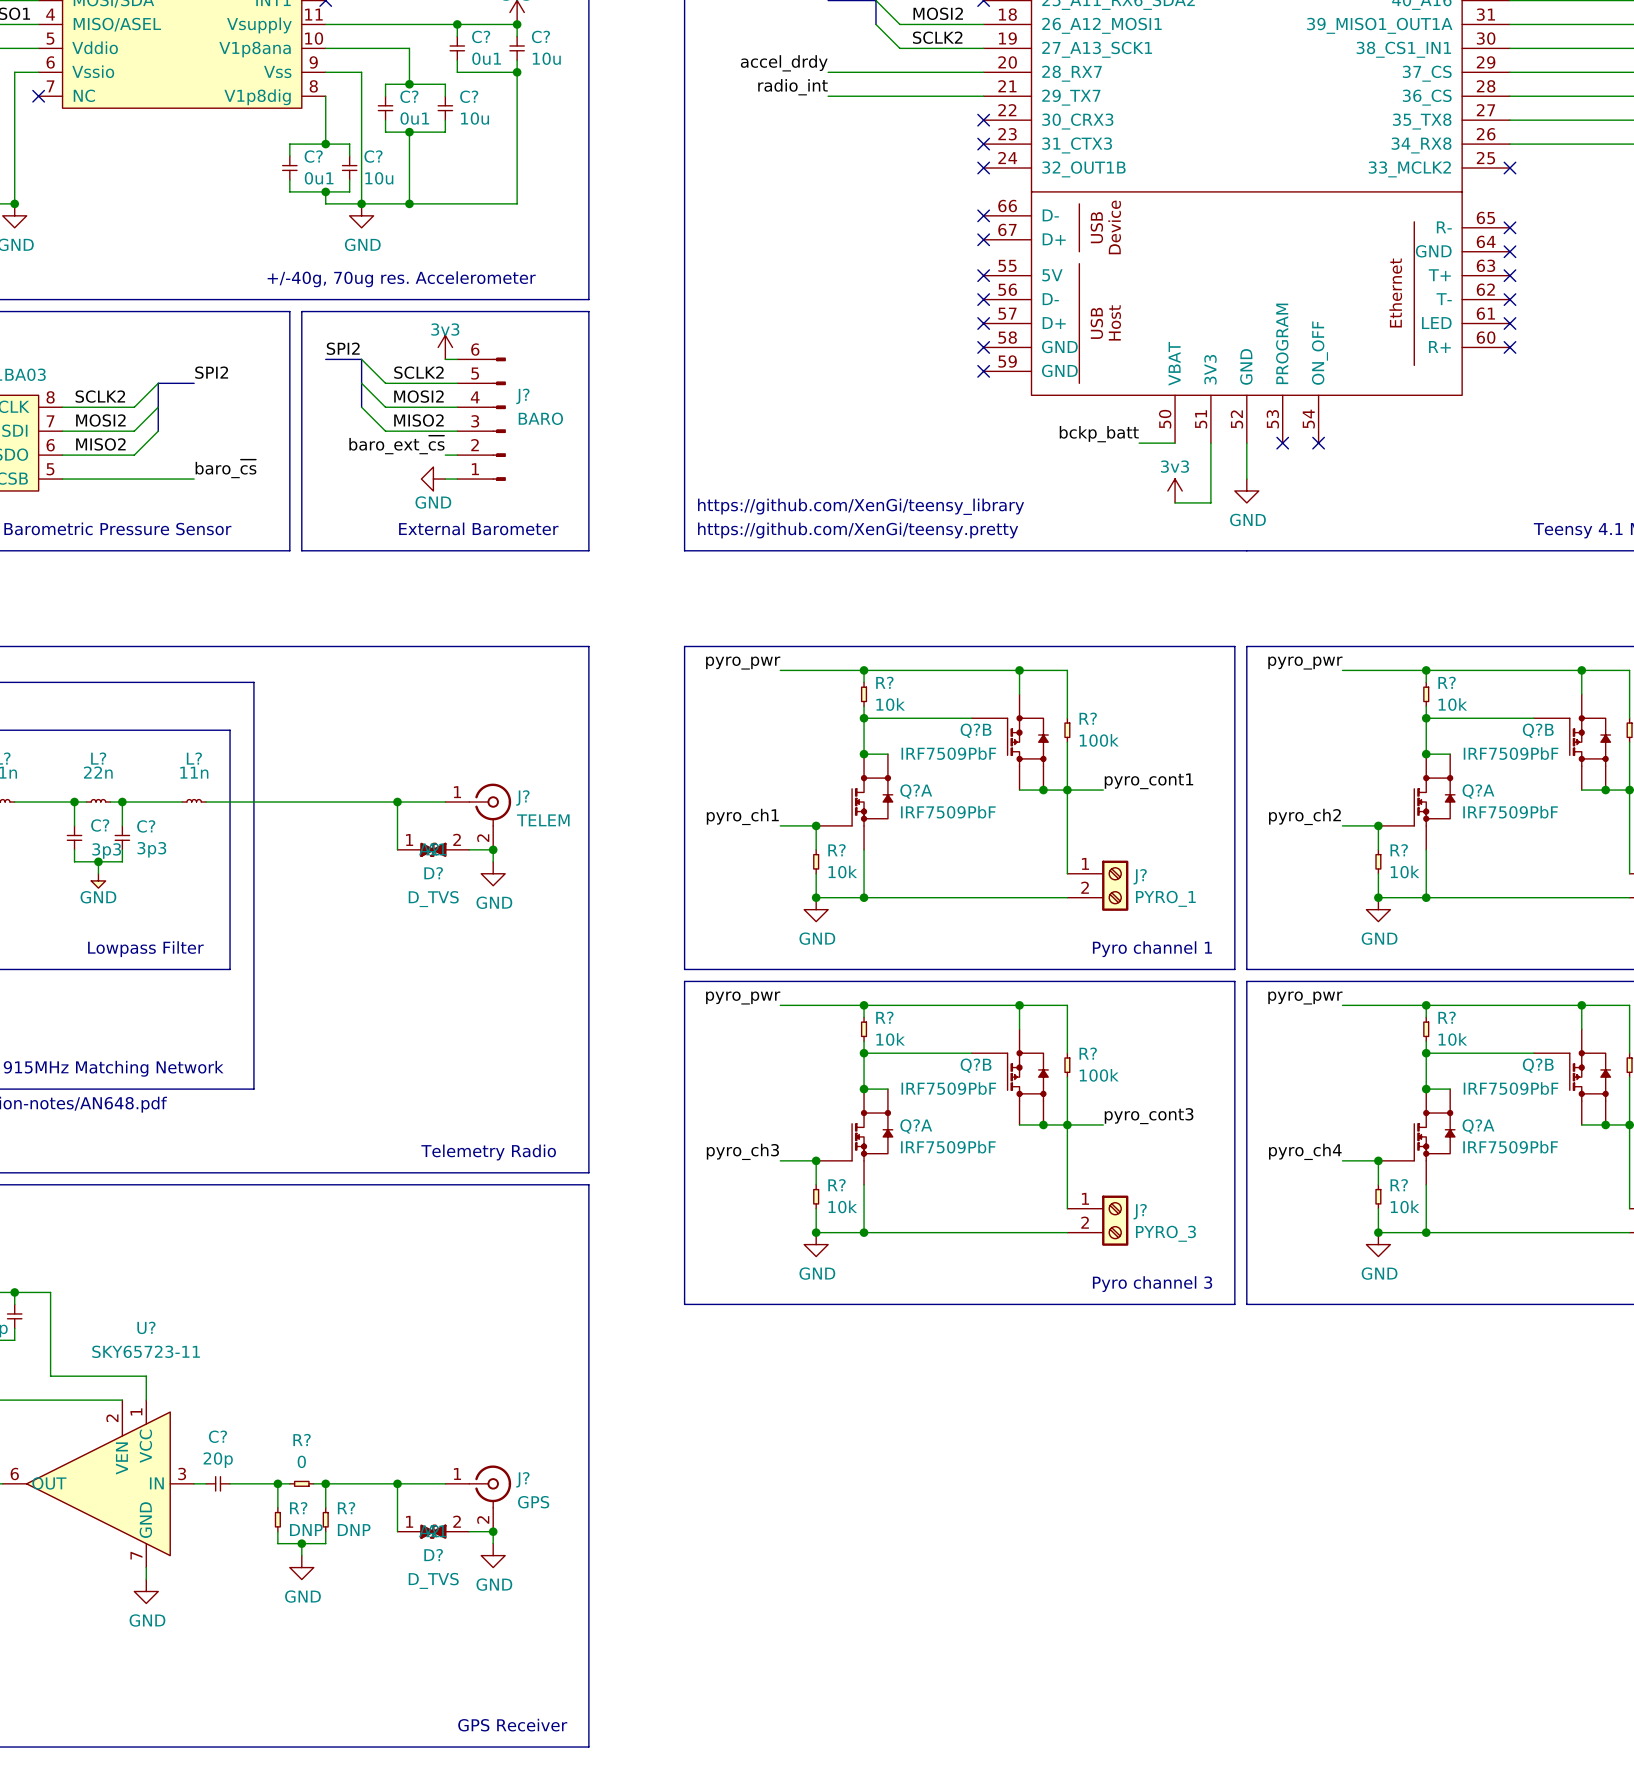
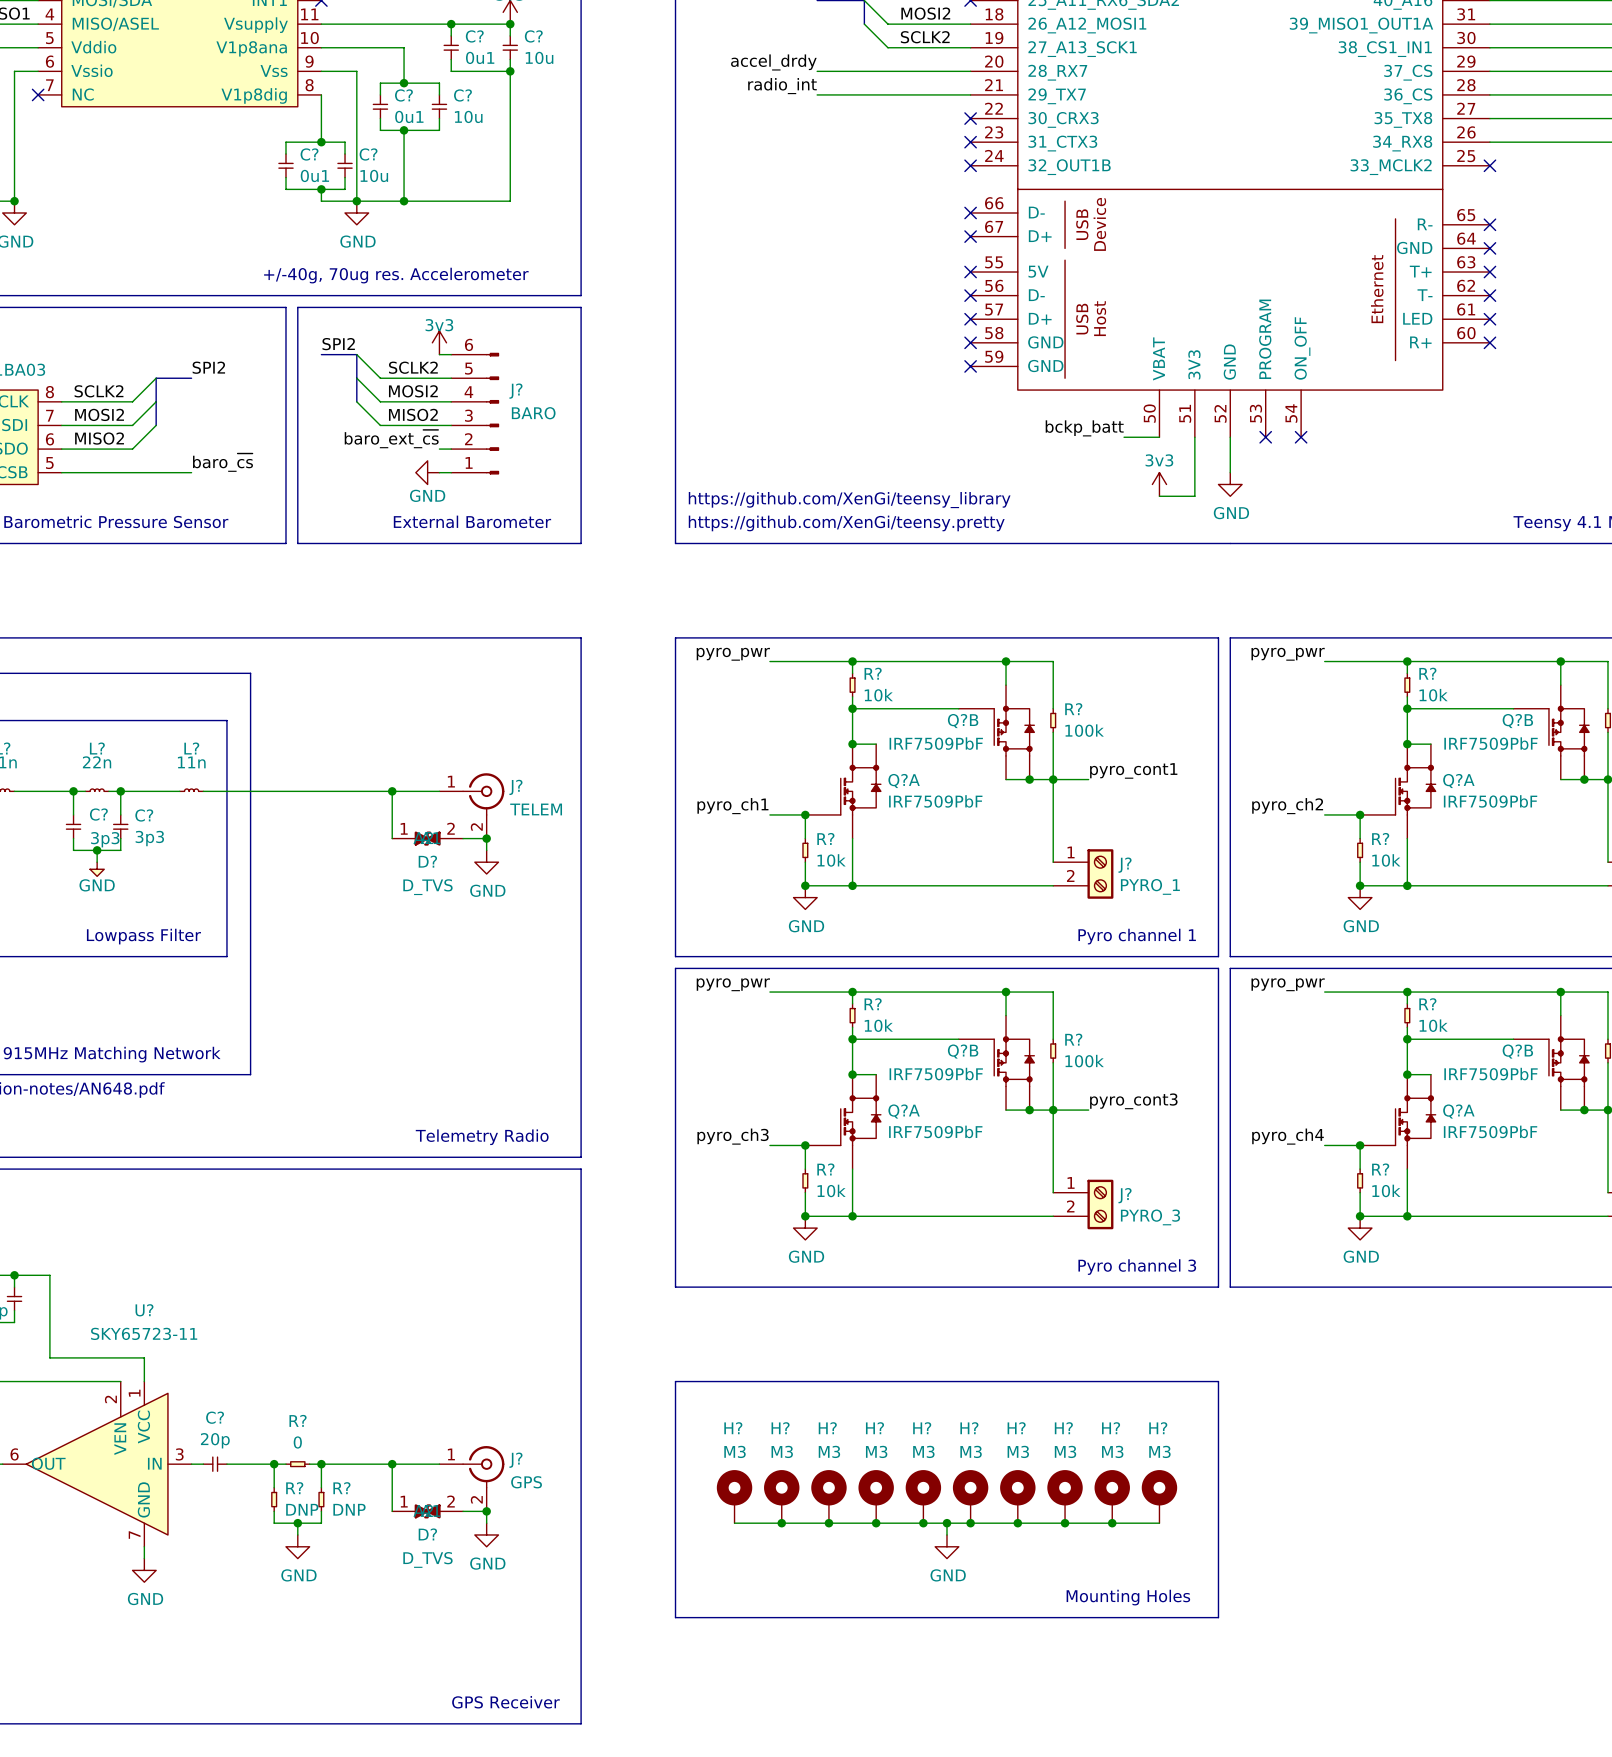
line: none -> (675, 1381) (675, 1617) (1218, 1617) (1218, 1381) (675, 1381)
H?: none -> M3 (734, 1496)
H?: none -> M3 (781, 1496)
H?: none -> M3 (828, 1496)
H?: none -> M3 (876, 1496)
H?: none -> M3 (923, 1496)
H?: none -> M3 (970, 1496)
H?: none -> M3 (1017, 1496)
H?: none -> M3 (1065, 1496)
H?: none -> M3 (1112, 1496)
H?: none -> M3 (1159, 1496)
wire: none -> (734, 1523) (1159, 1523)
junction: none -> (781, 1523)
junction: none -> (828, 1523)
junction: none -> (876, 1523)
junction: none -> (923, 1523)
wire: none -> (946, 1523) (946, 1534)
junction: none -> (946, 1523)
junction: none -> (970, 1523)
junction: none -> (1017, 1523)
junction: none -> (1065, 1523)
junction: none -> (1112, 1523)
power symbol: none -> GND (946, 1546)
text: none -> Mounting Holes (1128, 1597)

